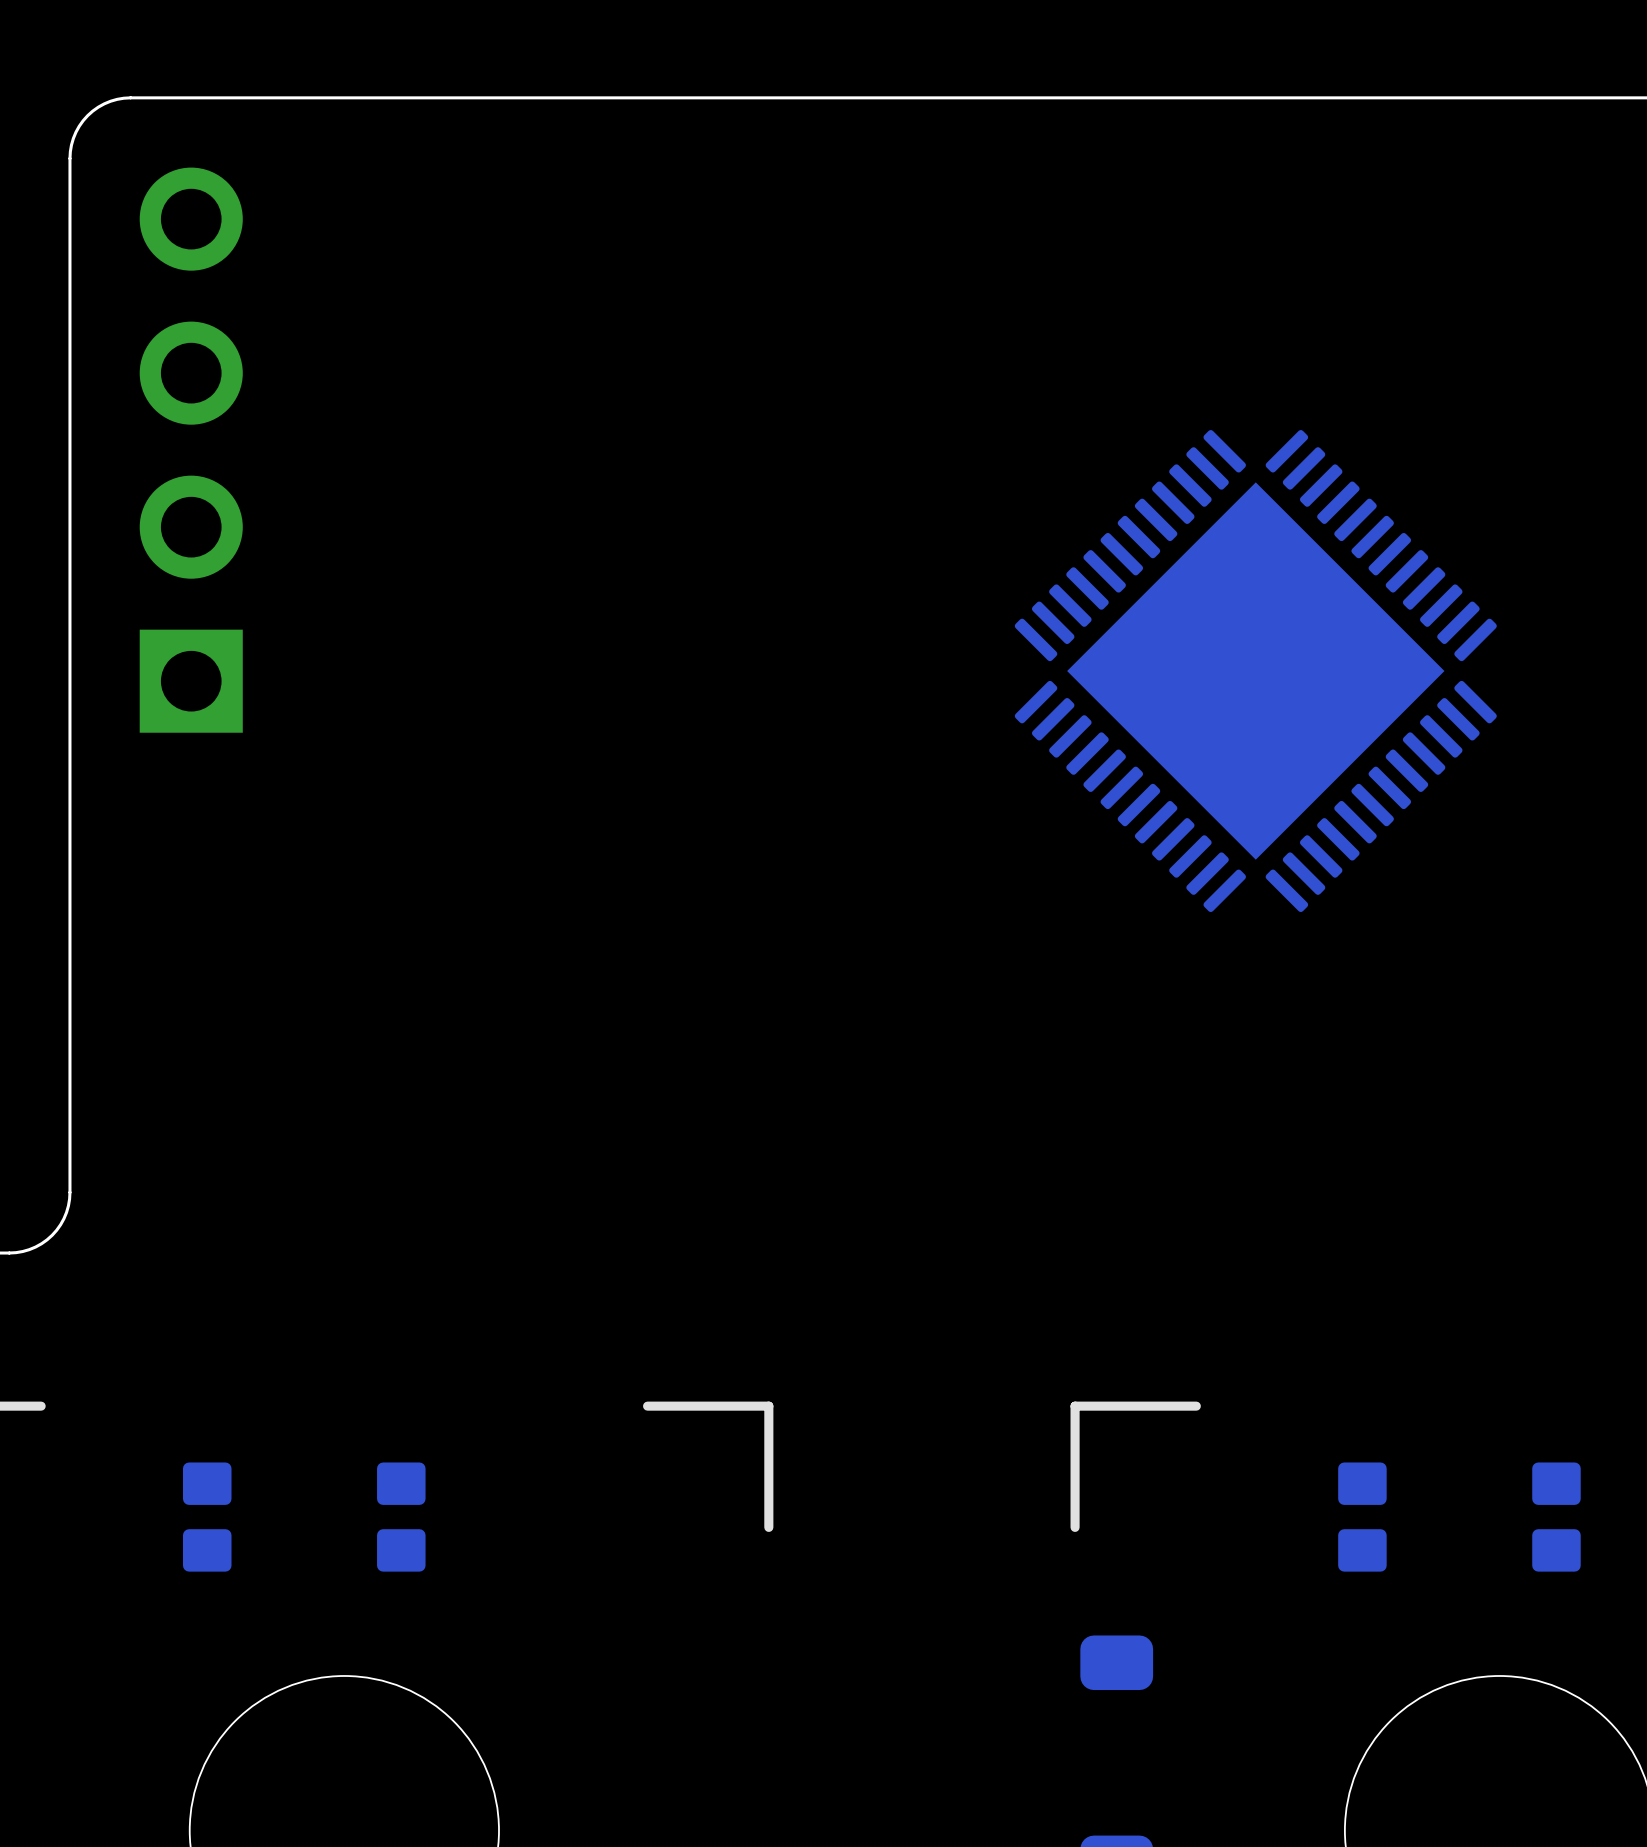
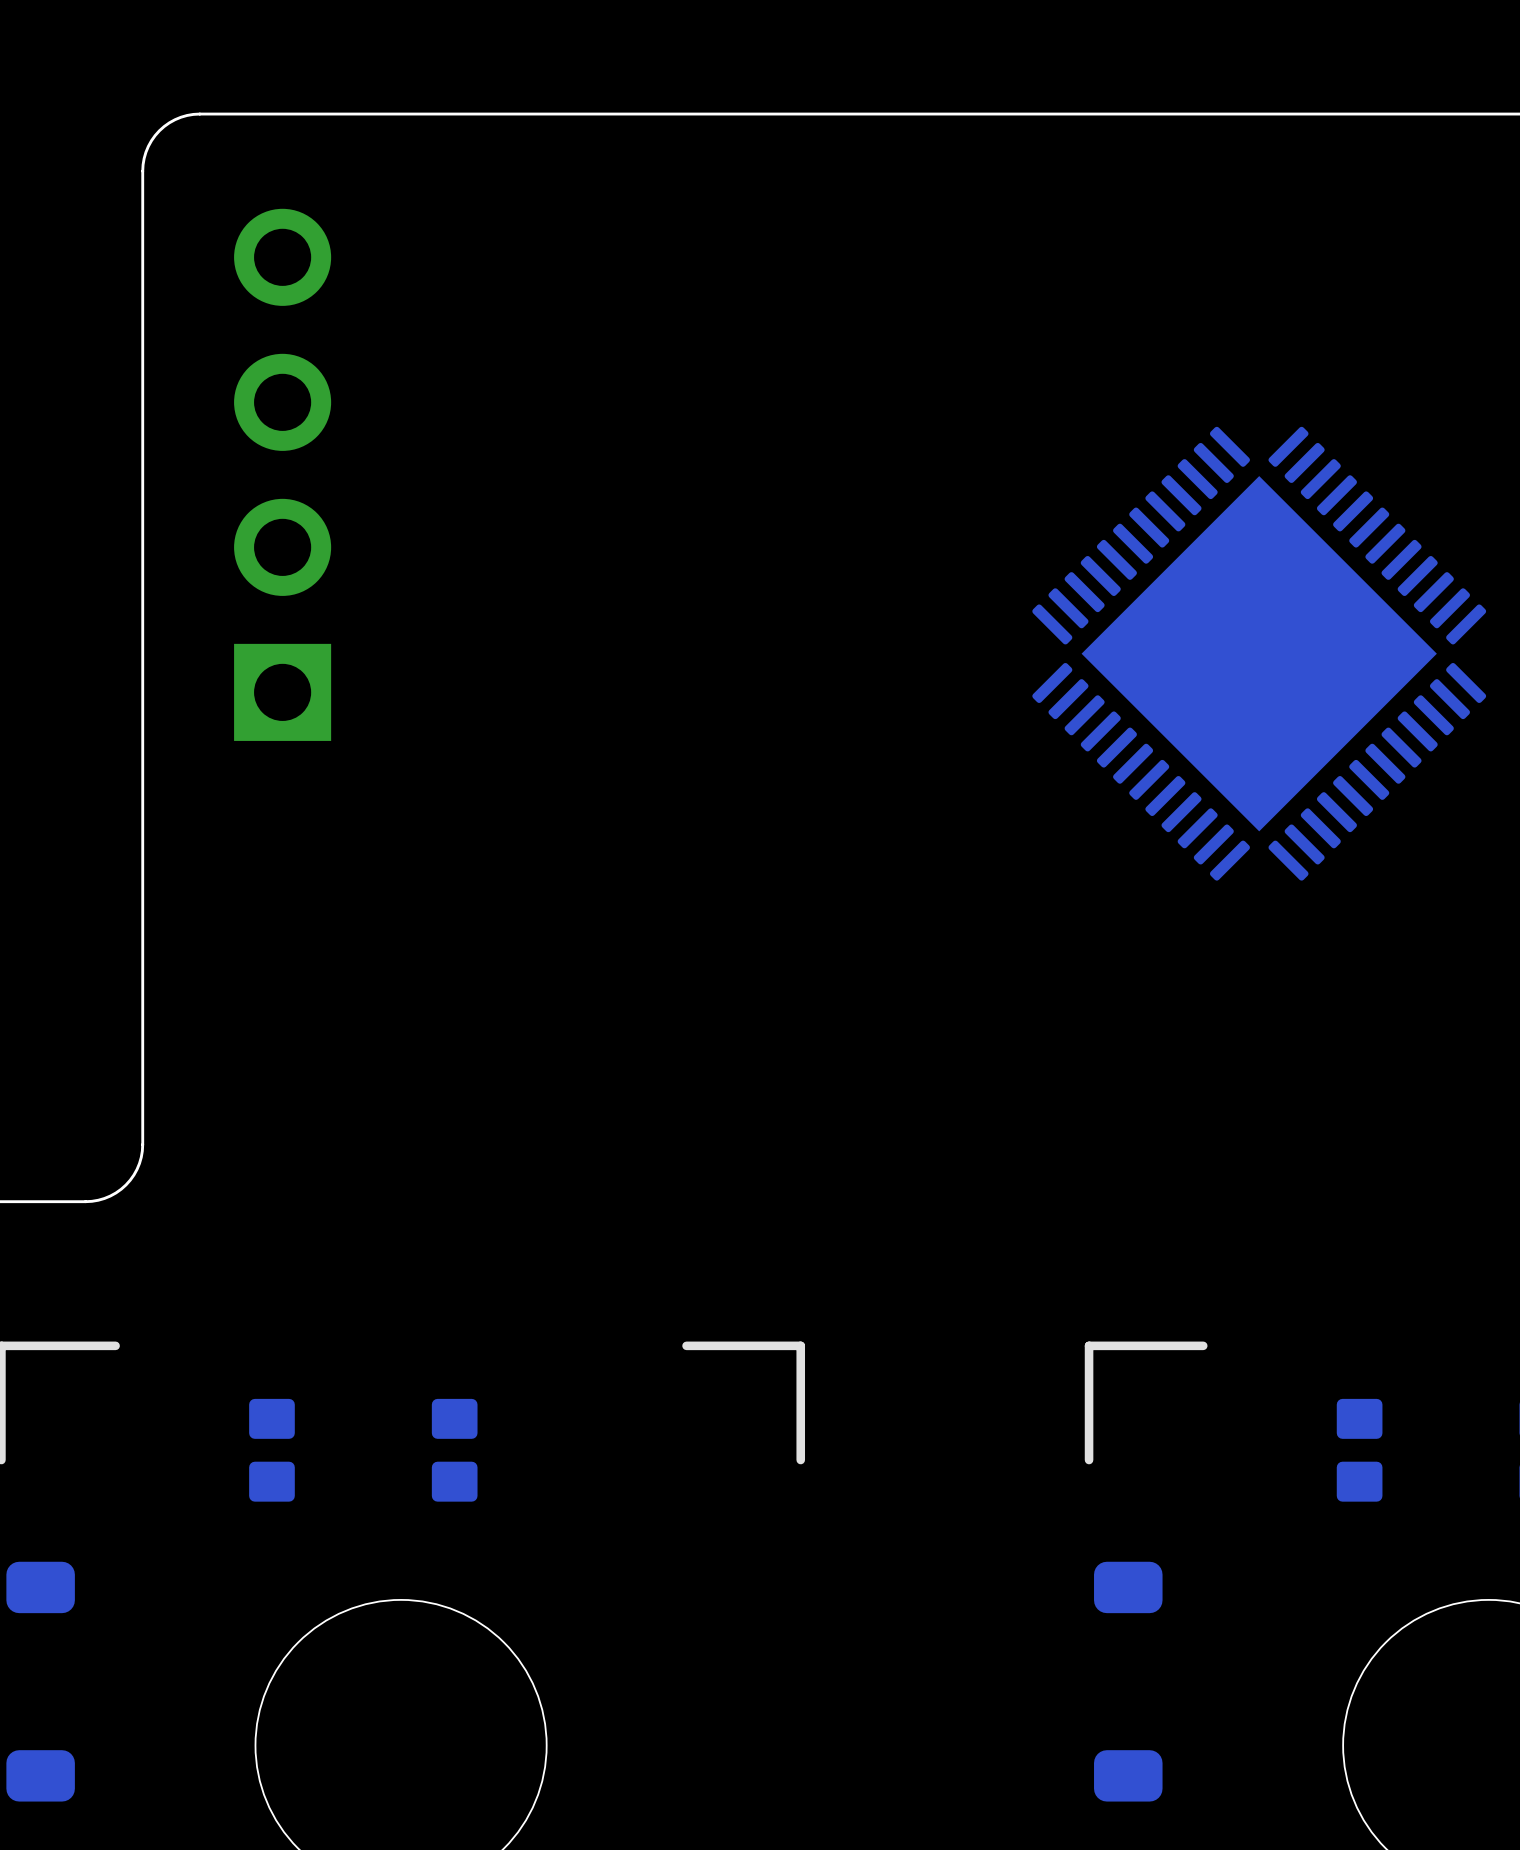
part position: (191, 450) -> (282, 474)

